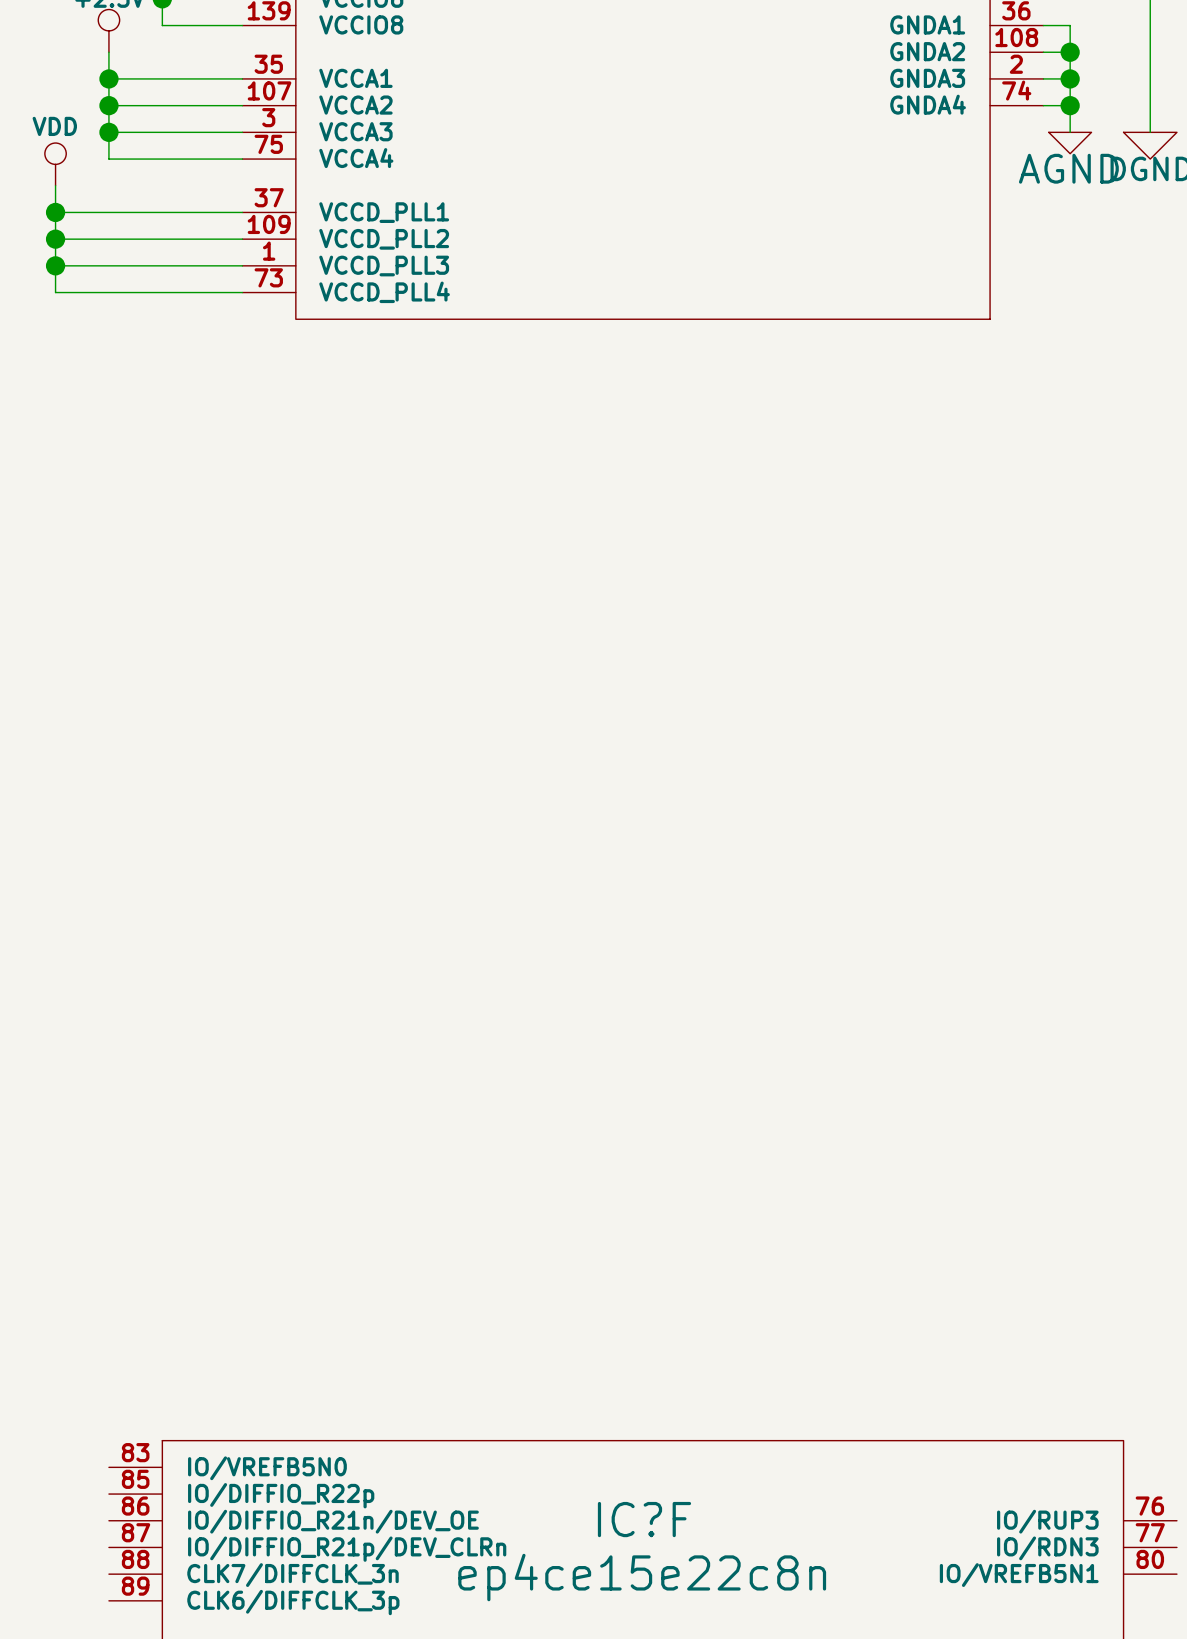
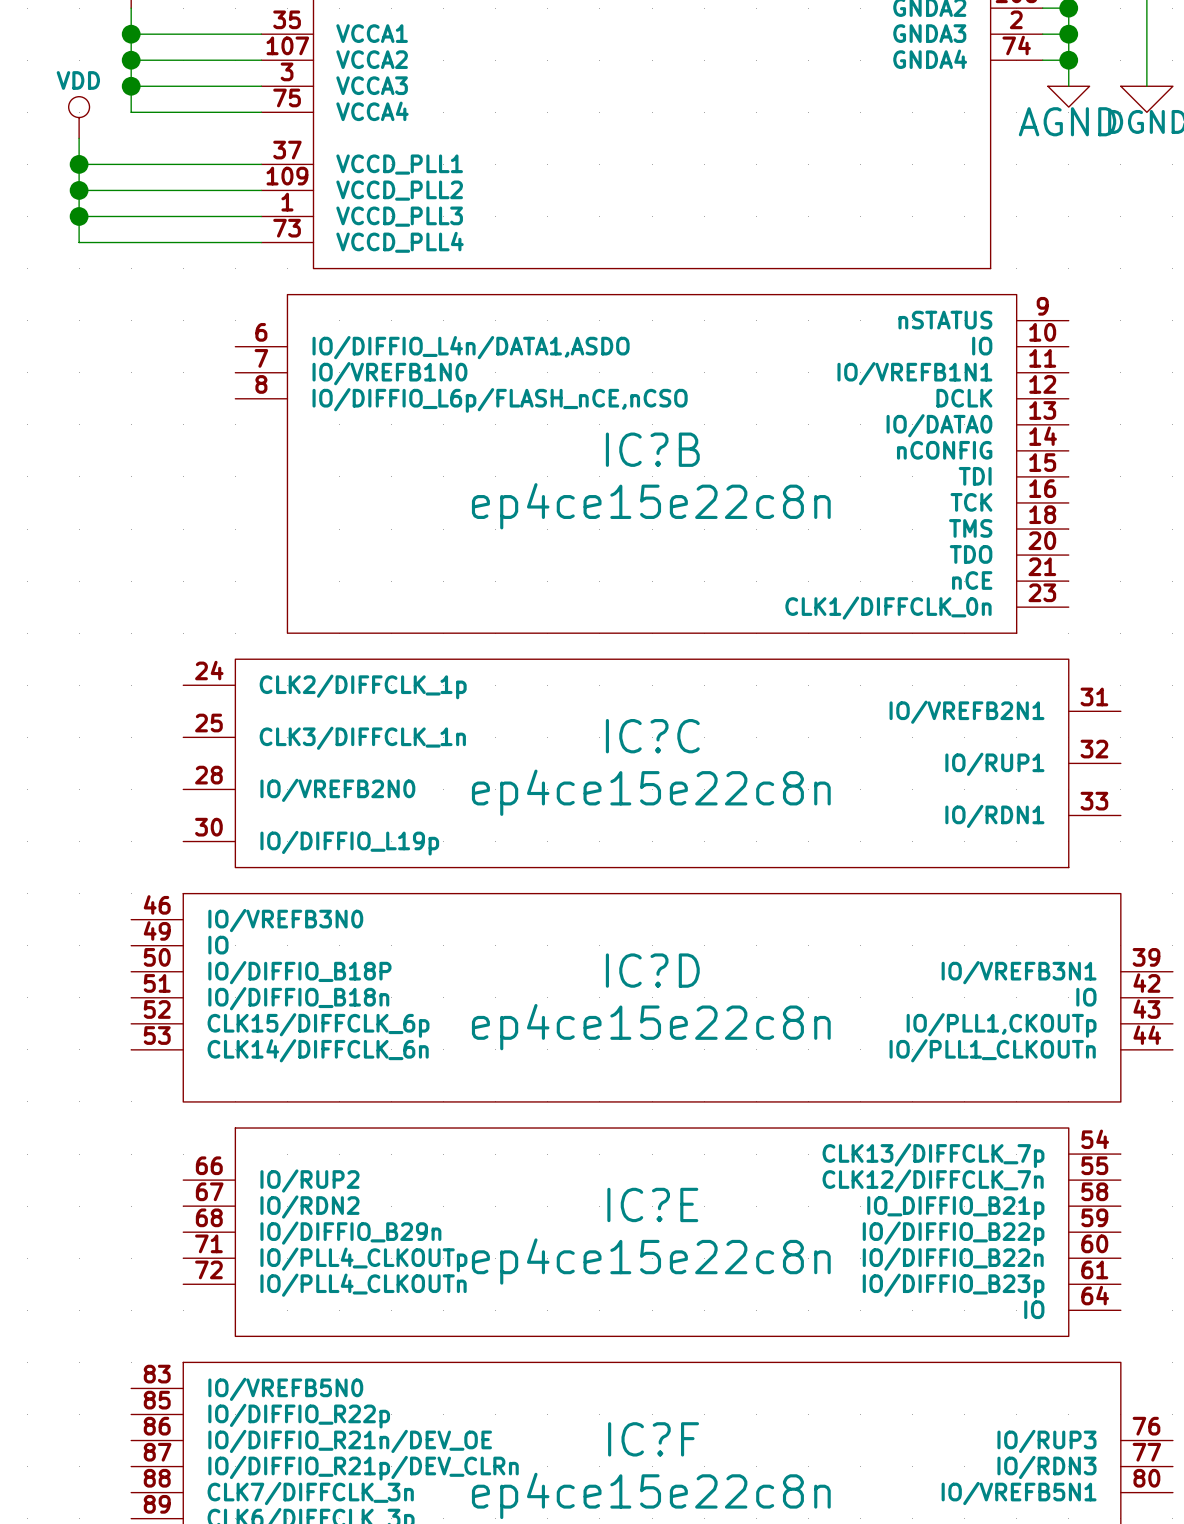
IC?B: none -> ep4ce15e22c8n (652, 463)
IC?C: none -> ep4ce15e22c8n (652, 763)
IC?D: none -> ep4ce15e22c8n (652, 997)
IC?E: none -> ep4ce15e22c8n (652, 1232)

